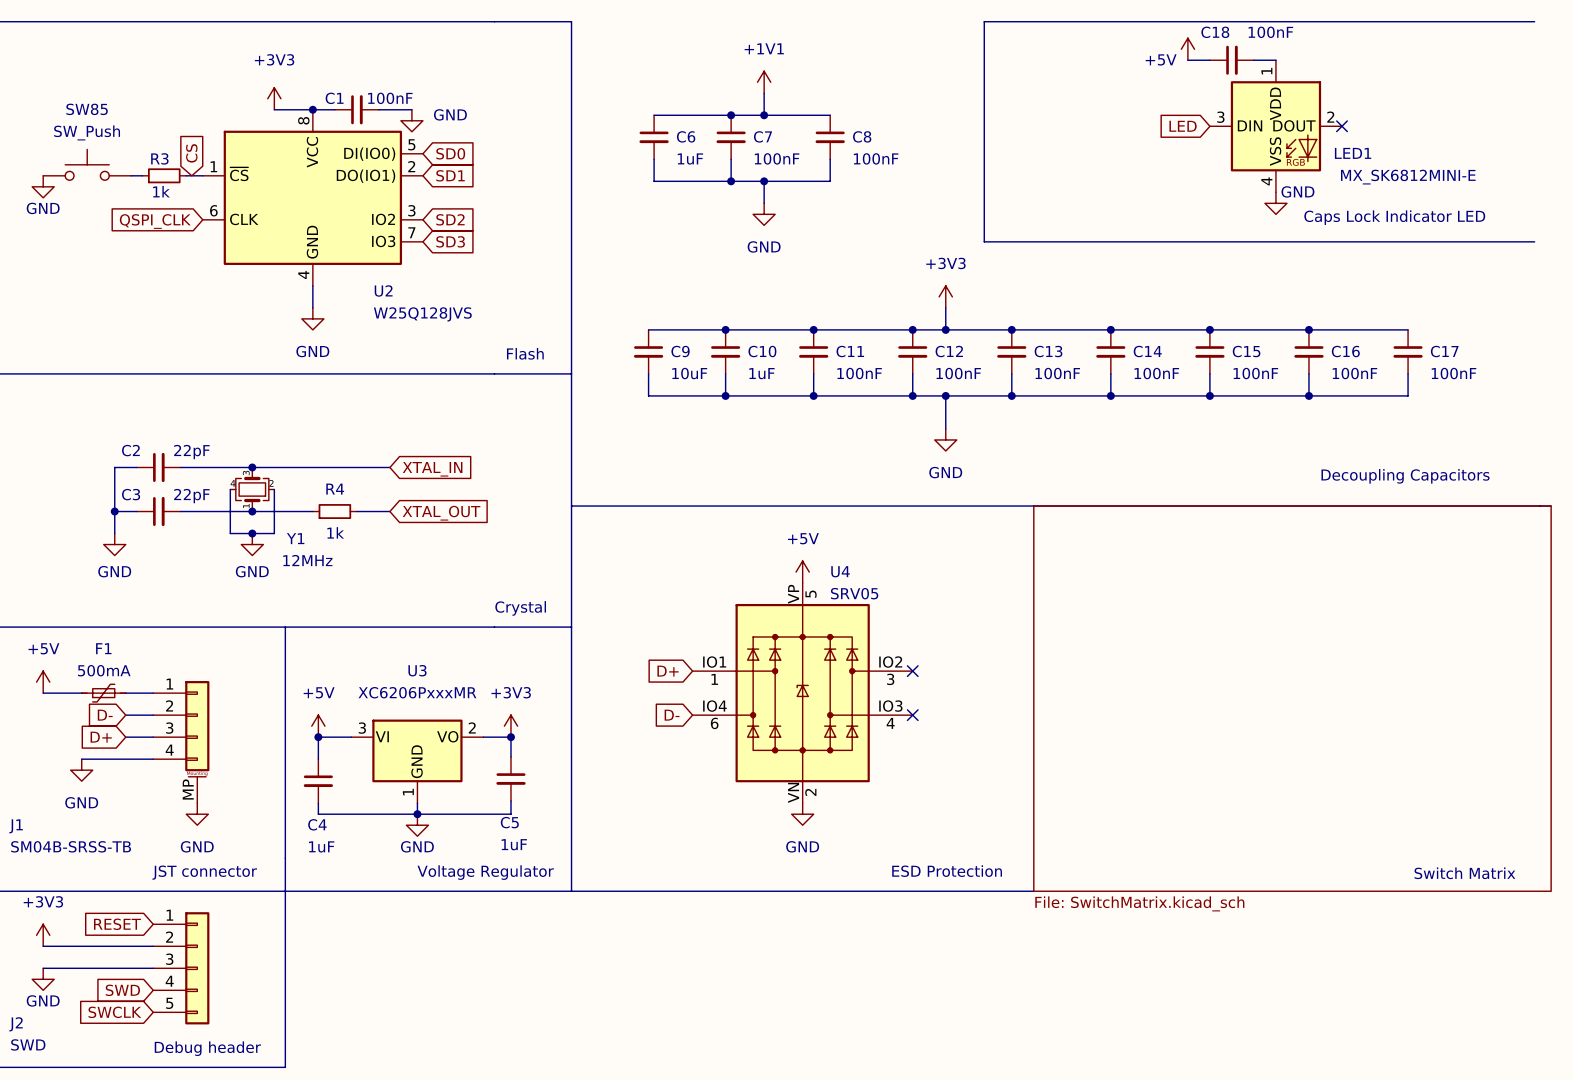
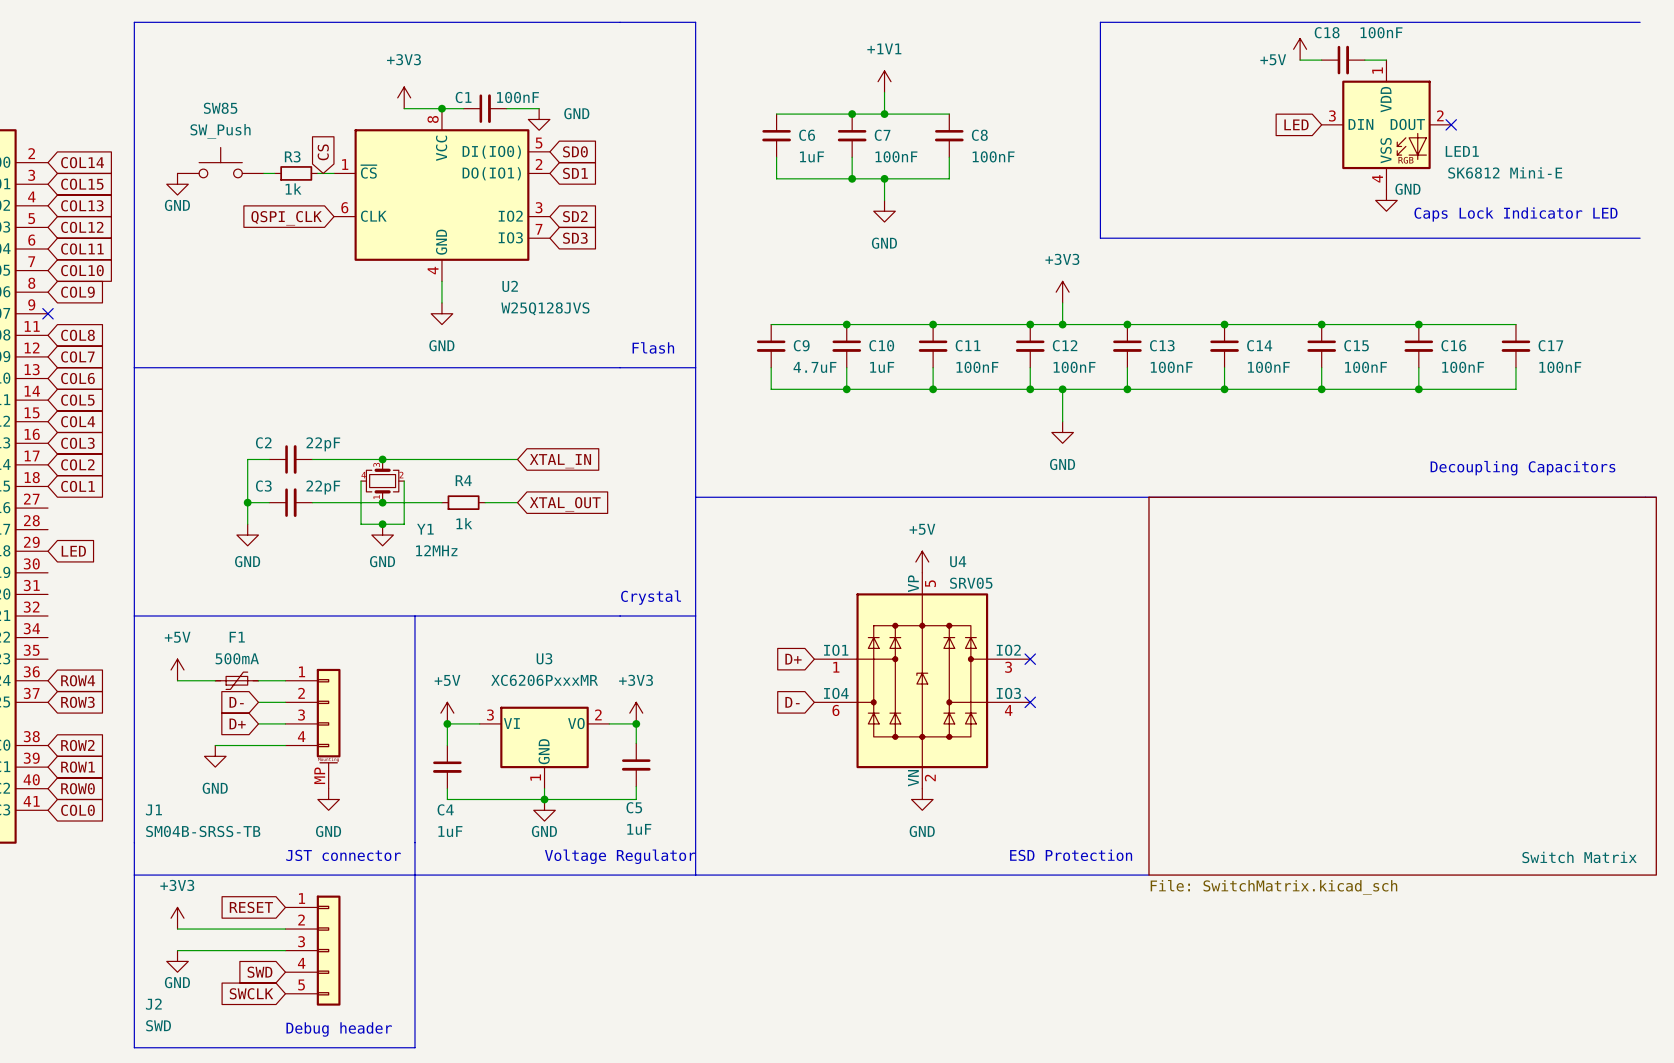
LED1 value: MX_SK6812MINI-E (1408, 177) -> SK6812 Mini-E (1505, 172)
C9 value: 10uF (689, 373) -> 4.7uF (814, 367)

